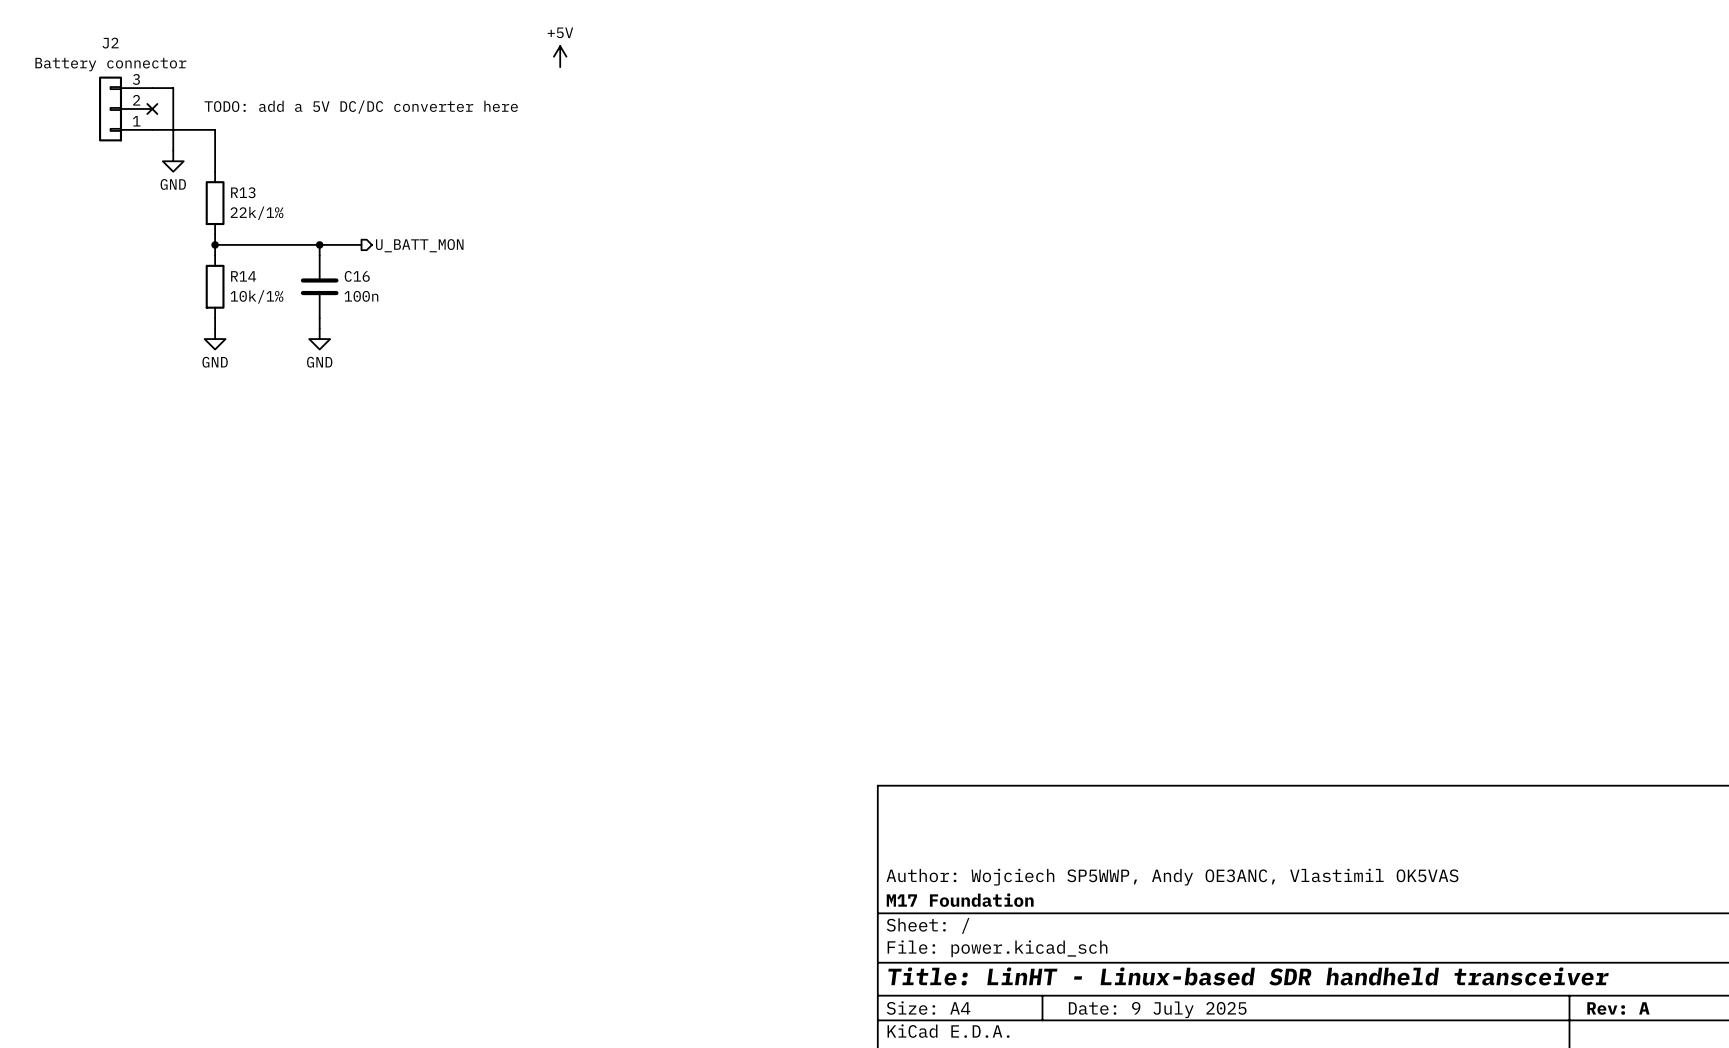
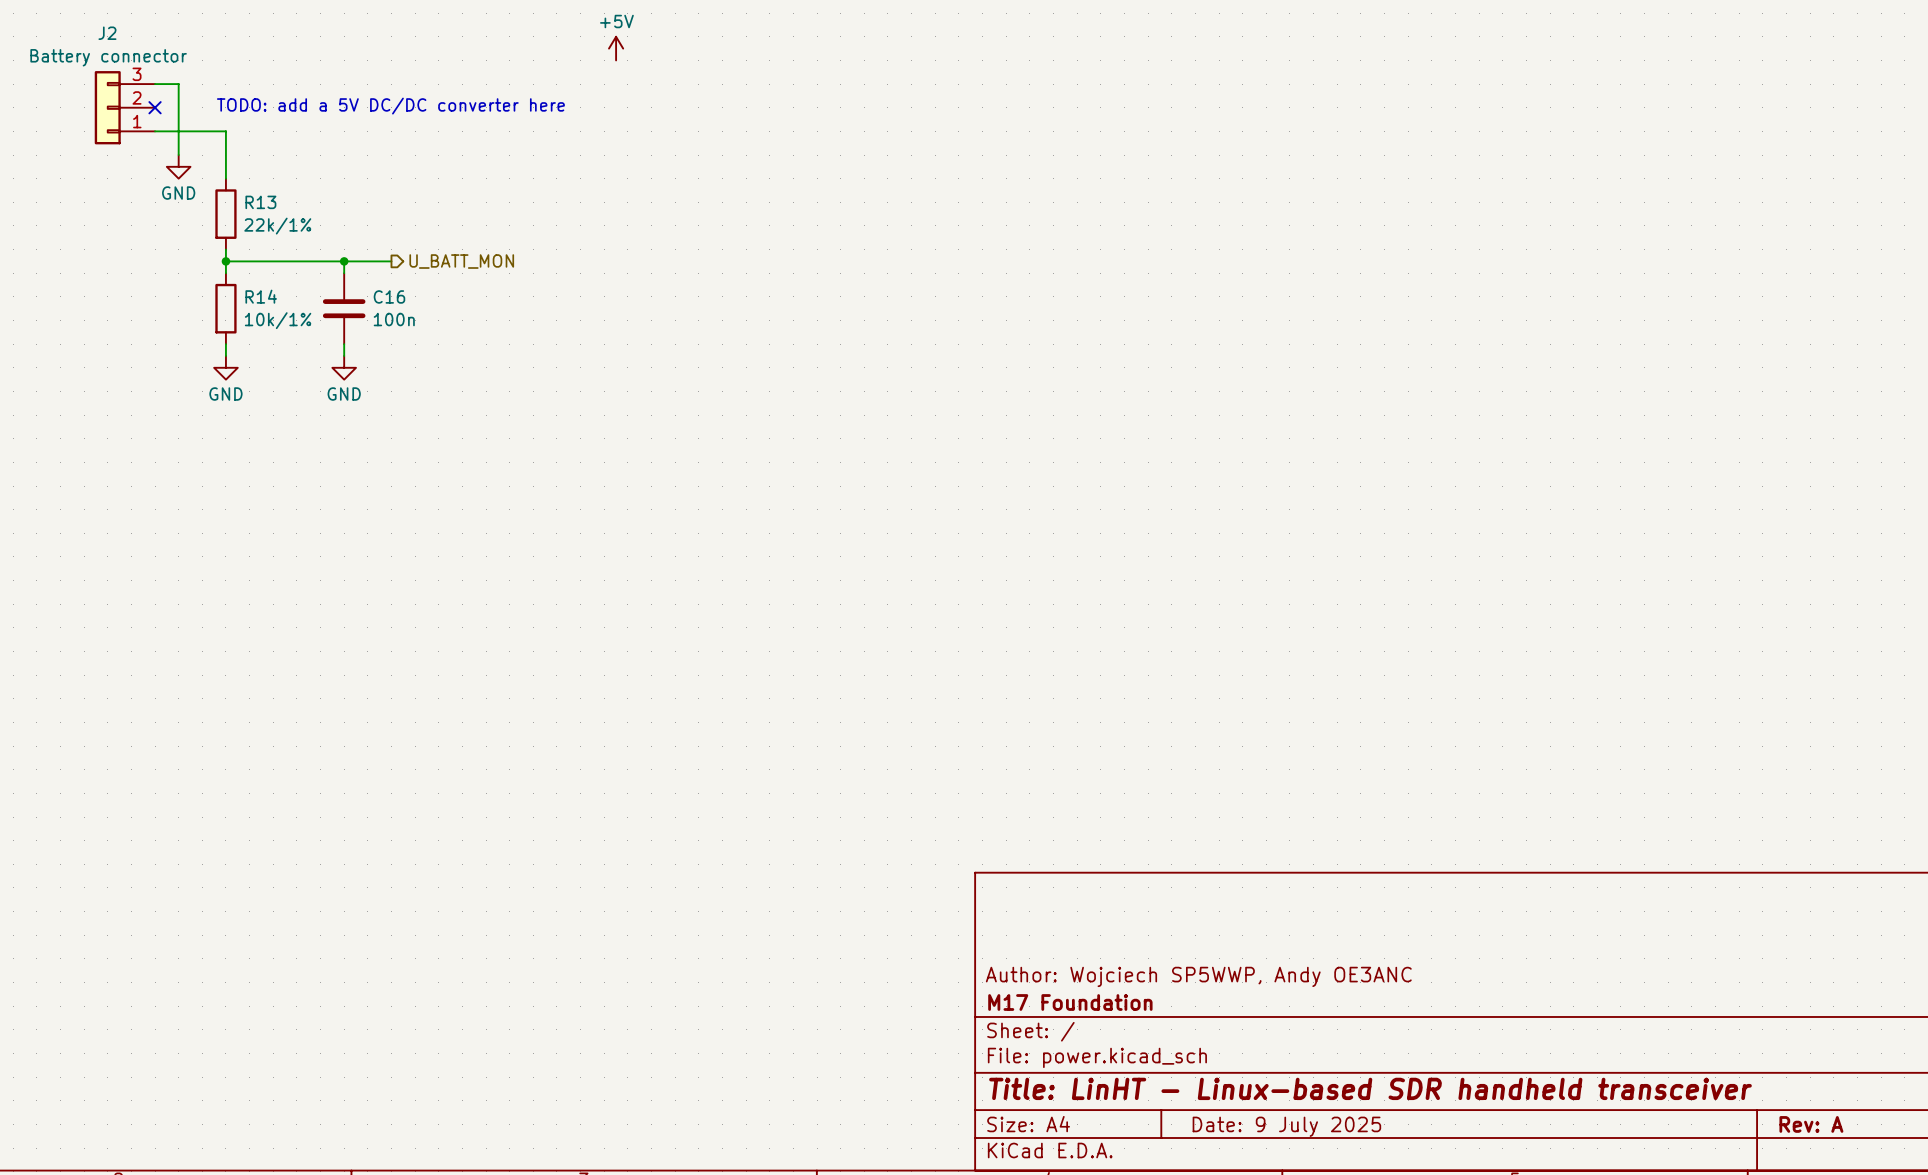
title block: Author: Wojciech SP5WWP, Andy OE3ANC, Vlastimil OK5VAS (1172, 877) -> Author: Wojciech SP5WWP, Andy OE3ANC (1198, 976)

